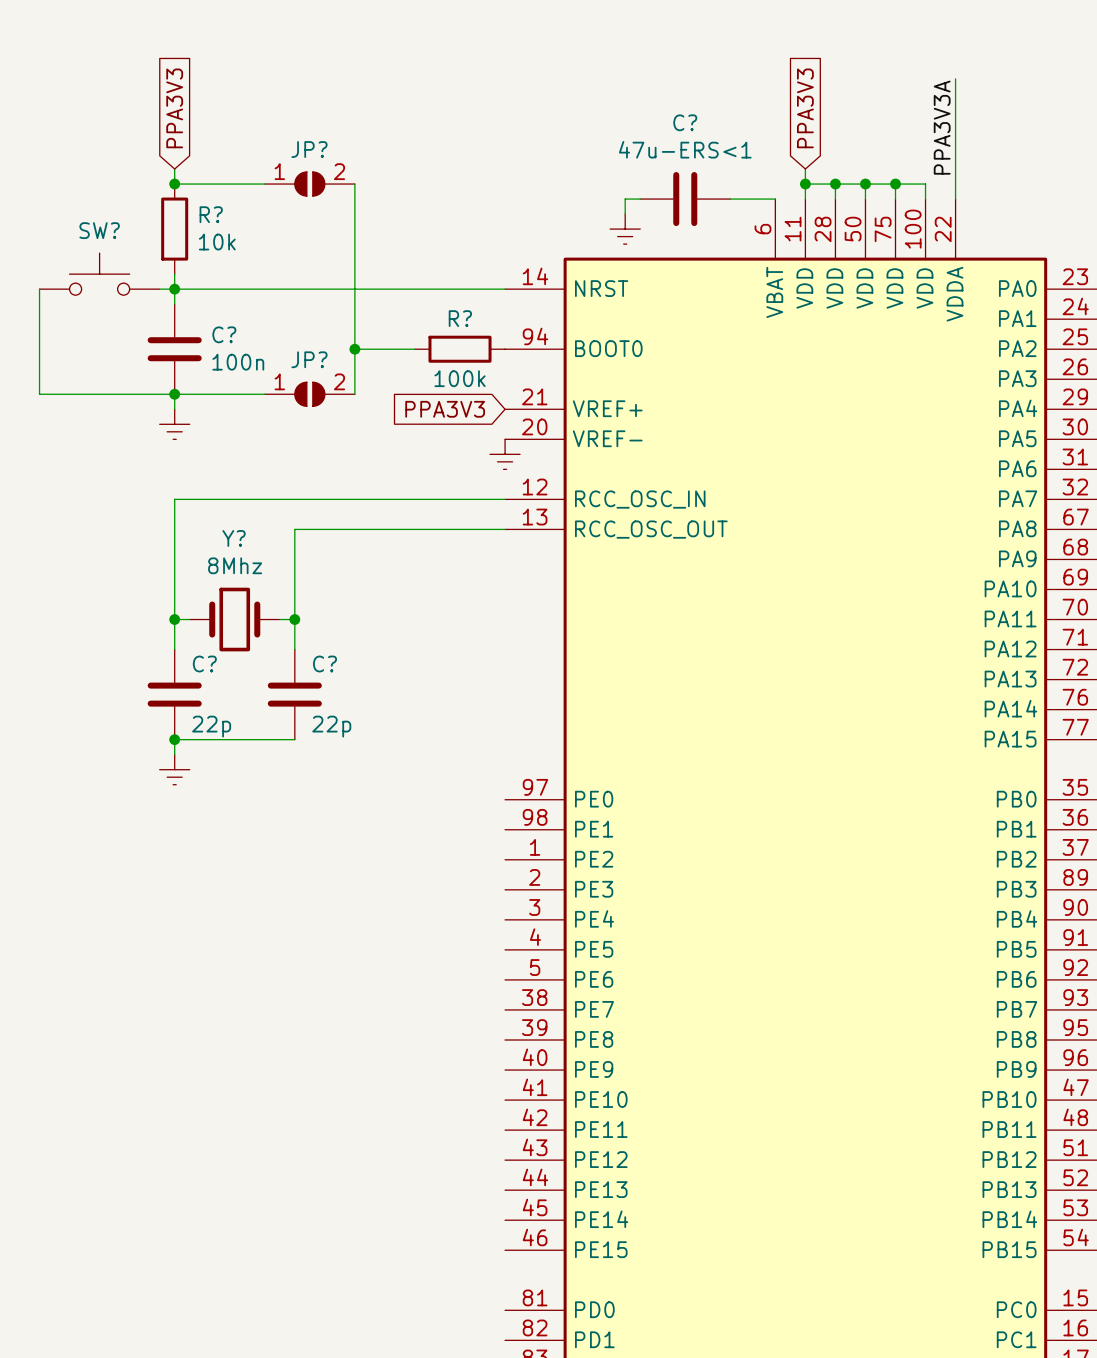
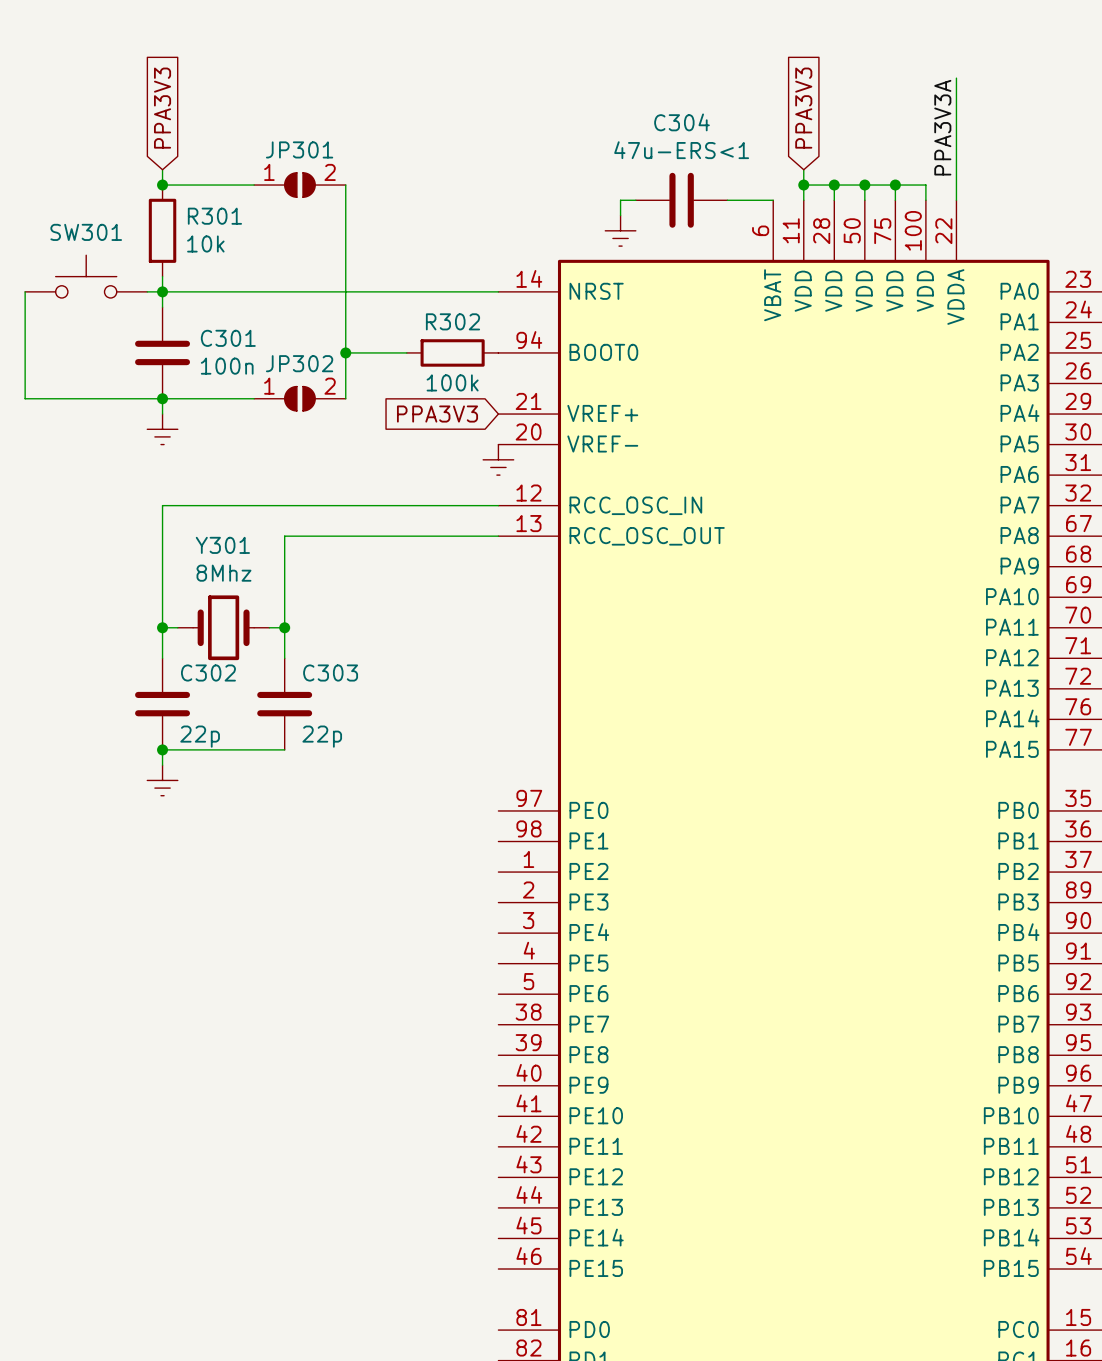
C? name: C? (685, 122) -> C304 (681, 122)
JP? name: JP? (309, 149) -> JP301 (299, 149)
R? name: R? (211, 214) -> R301 (214, 216)
SW? name: SW? (99, 230) -> SW301 (86, 232)
R? name: R? (460, 318) -> R302 (452, 321)
C? name: C? (224, 334) -> C301 (228, 338)
JP? name: JP? (309, 359) -> JP302 (299, 363)
Y? name: Y? (234, 538) -> Y301 (222, 545)
C? name: C? (204, 664) -> C302 (208, 673)
C? name: C? (324, 664) -> C303 (330, 673)

